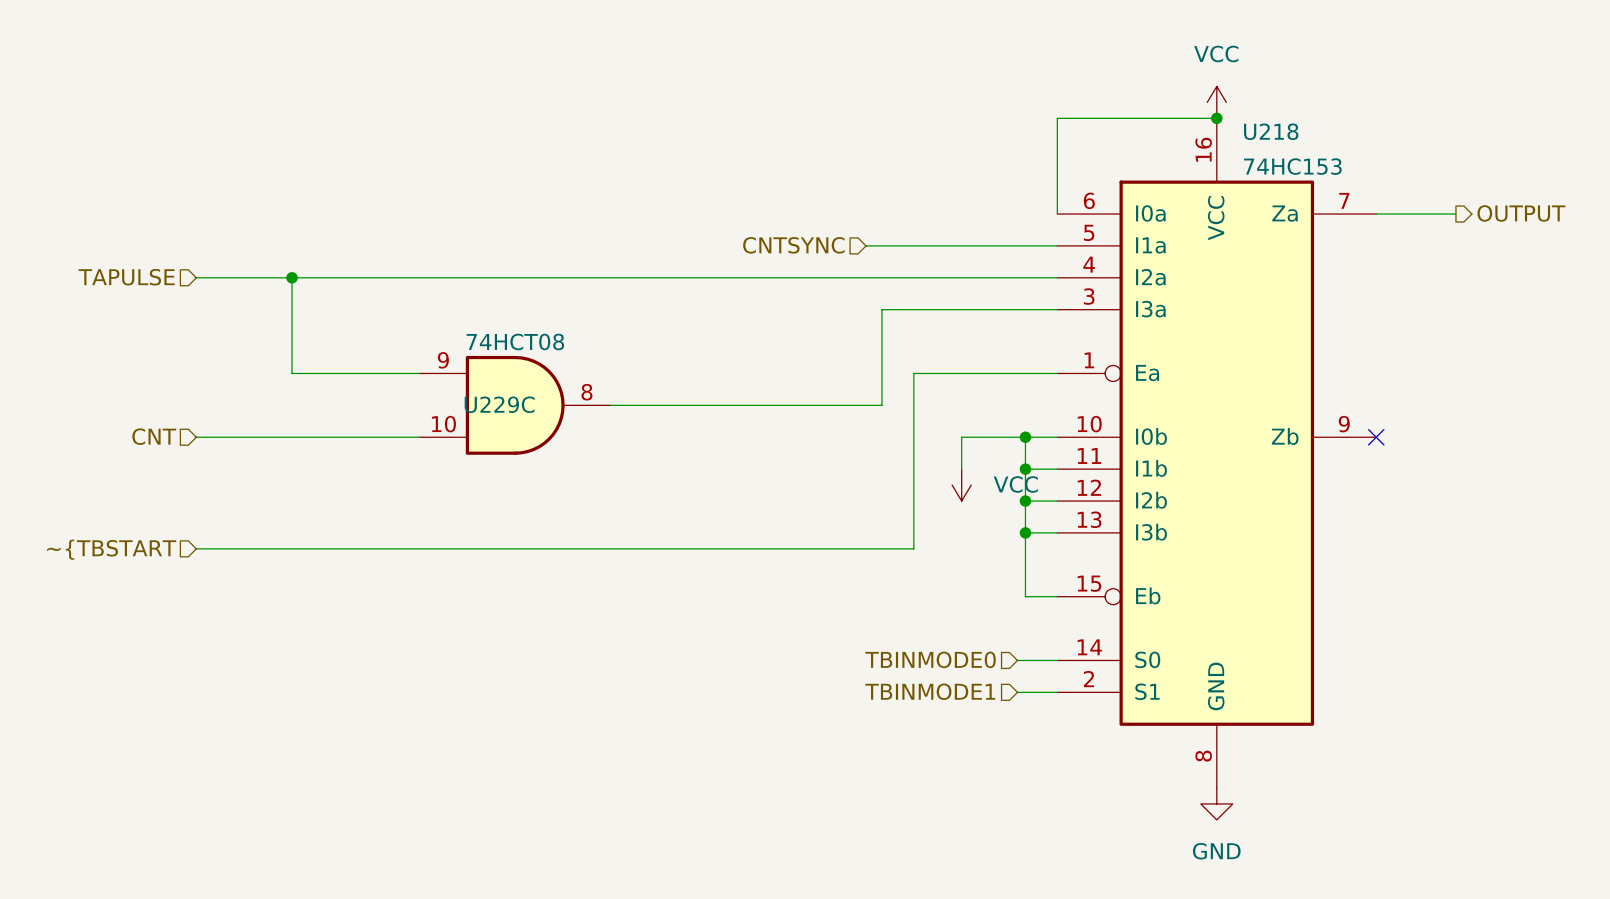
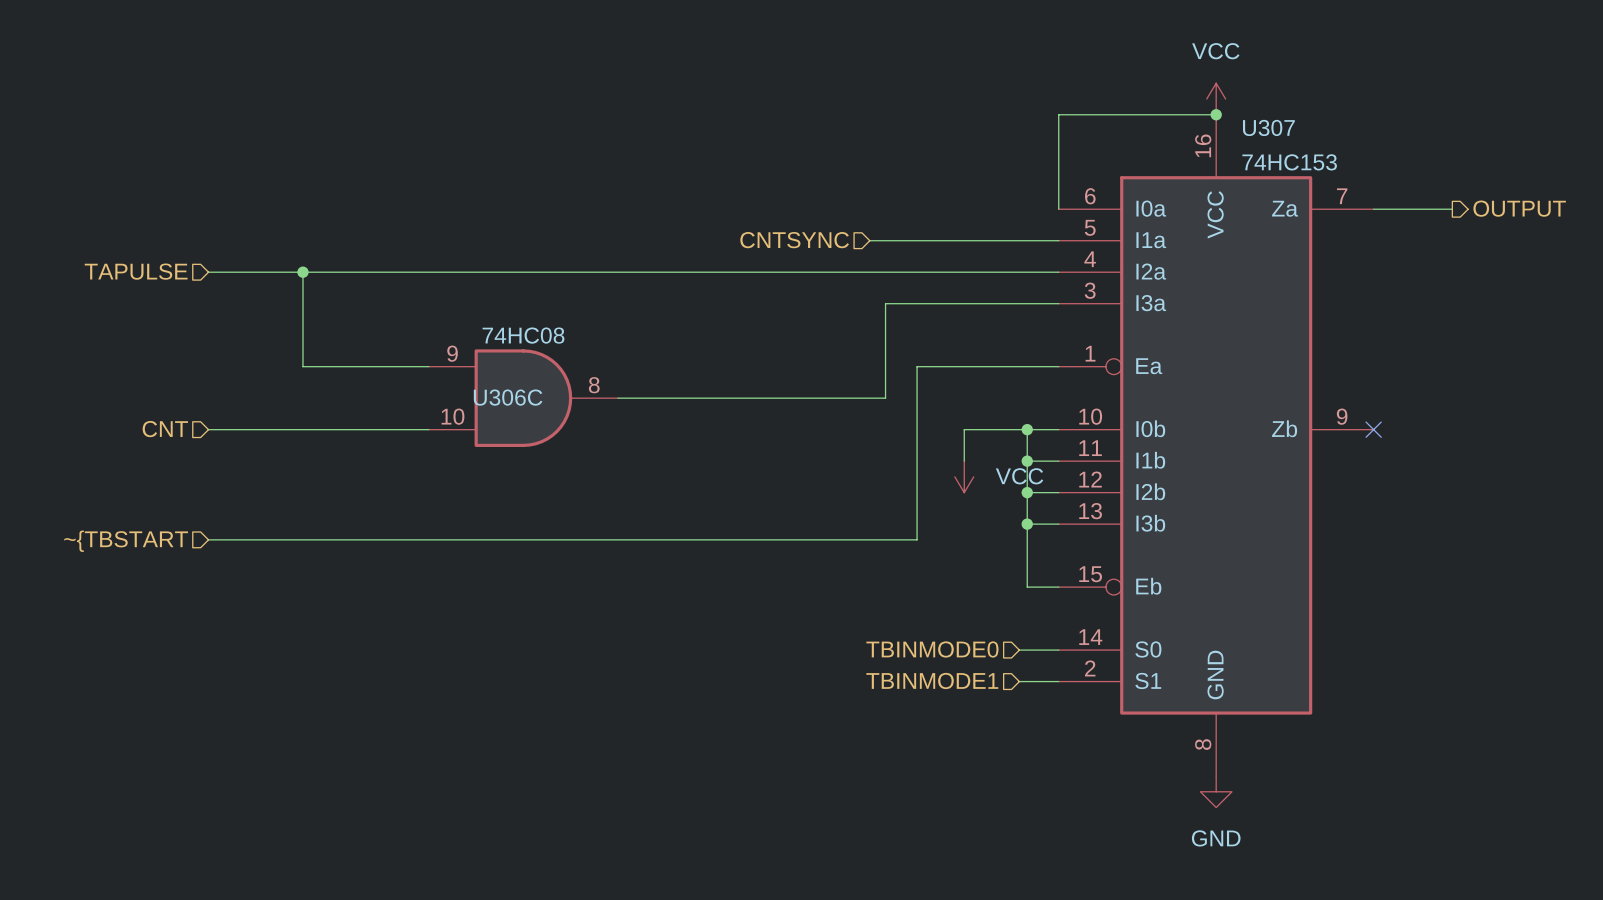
U218 name: U218 (1271, 131) -> U307 (1268, 127)
U229C value: 74HCT08 (515, 341) -> 74HC08 (523, 335)
U229C name: U229C (499, 404) -> U306C (508, 397)

